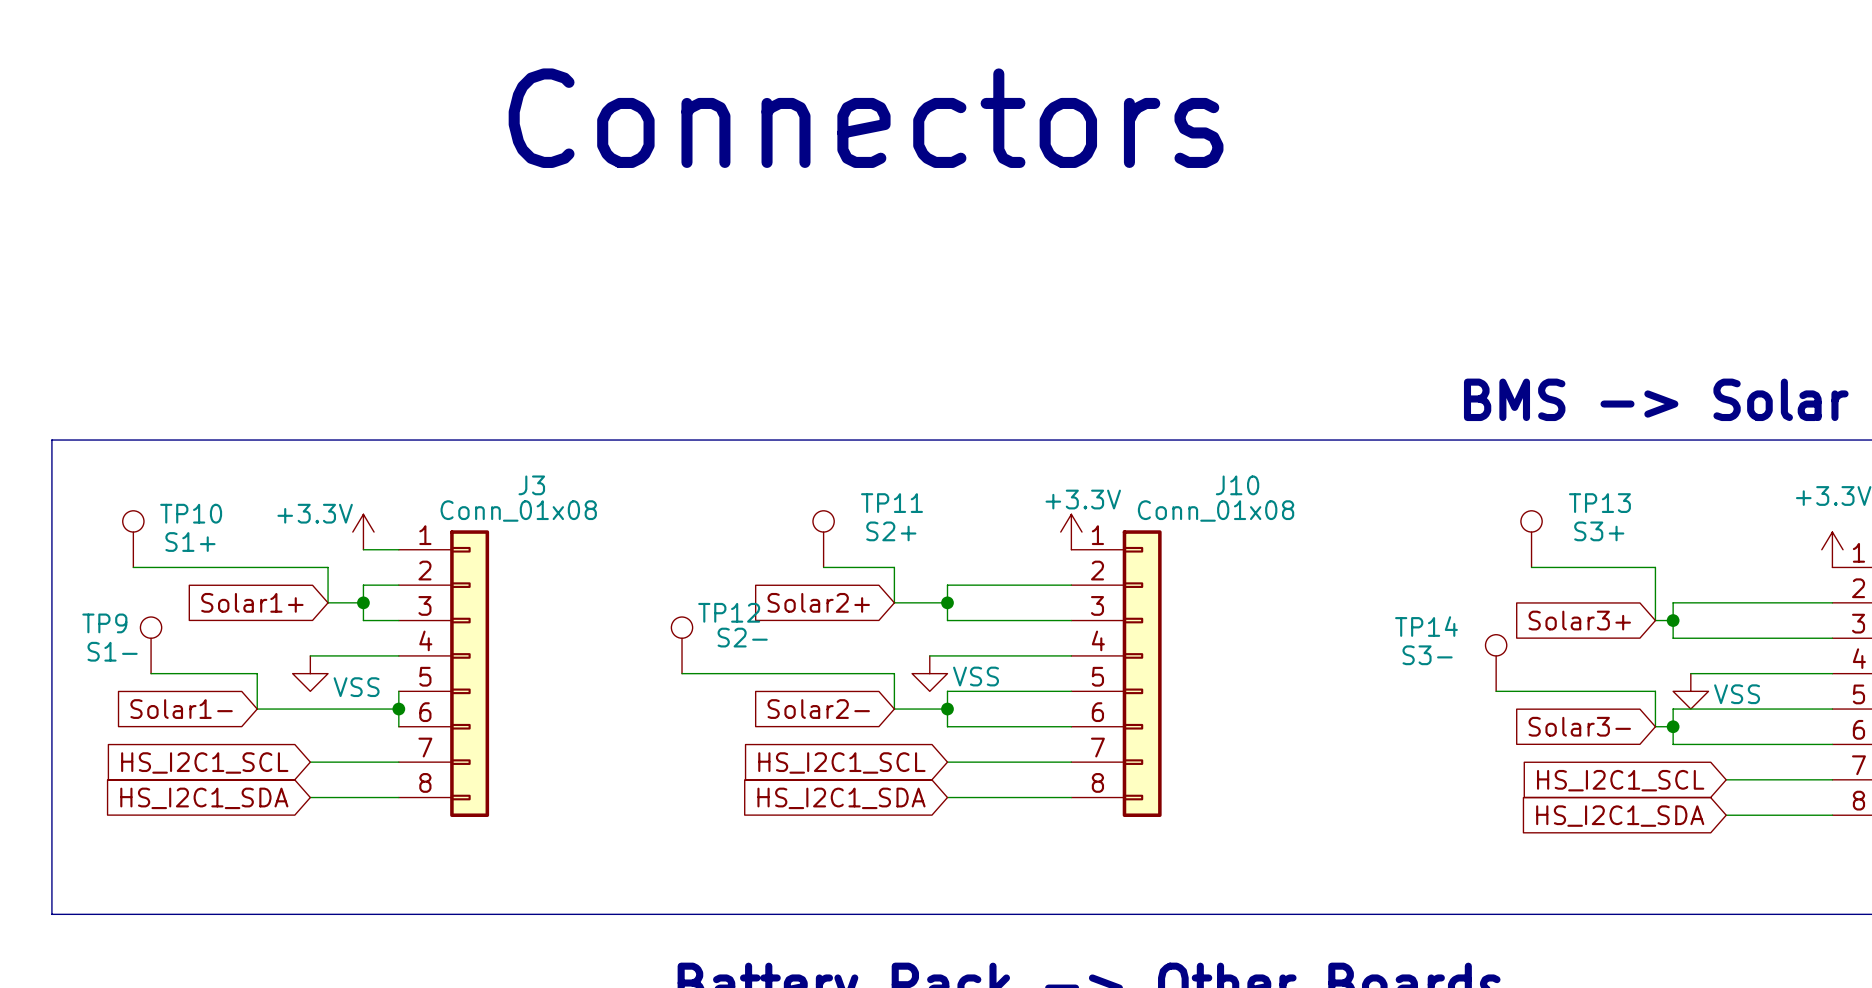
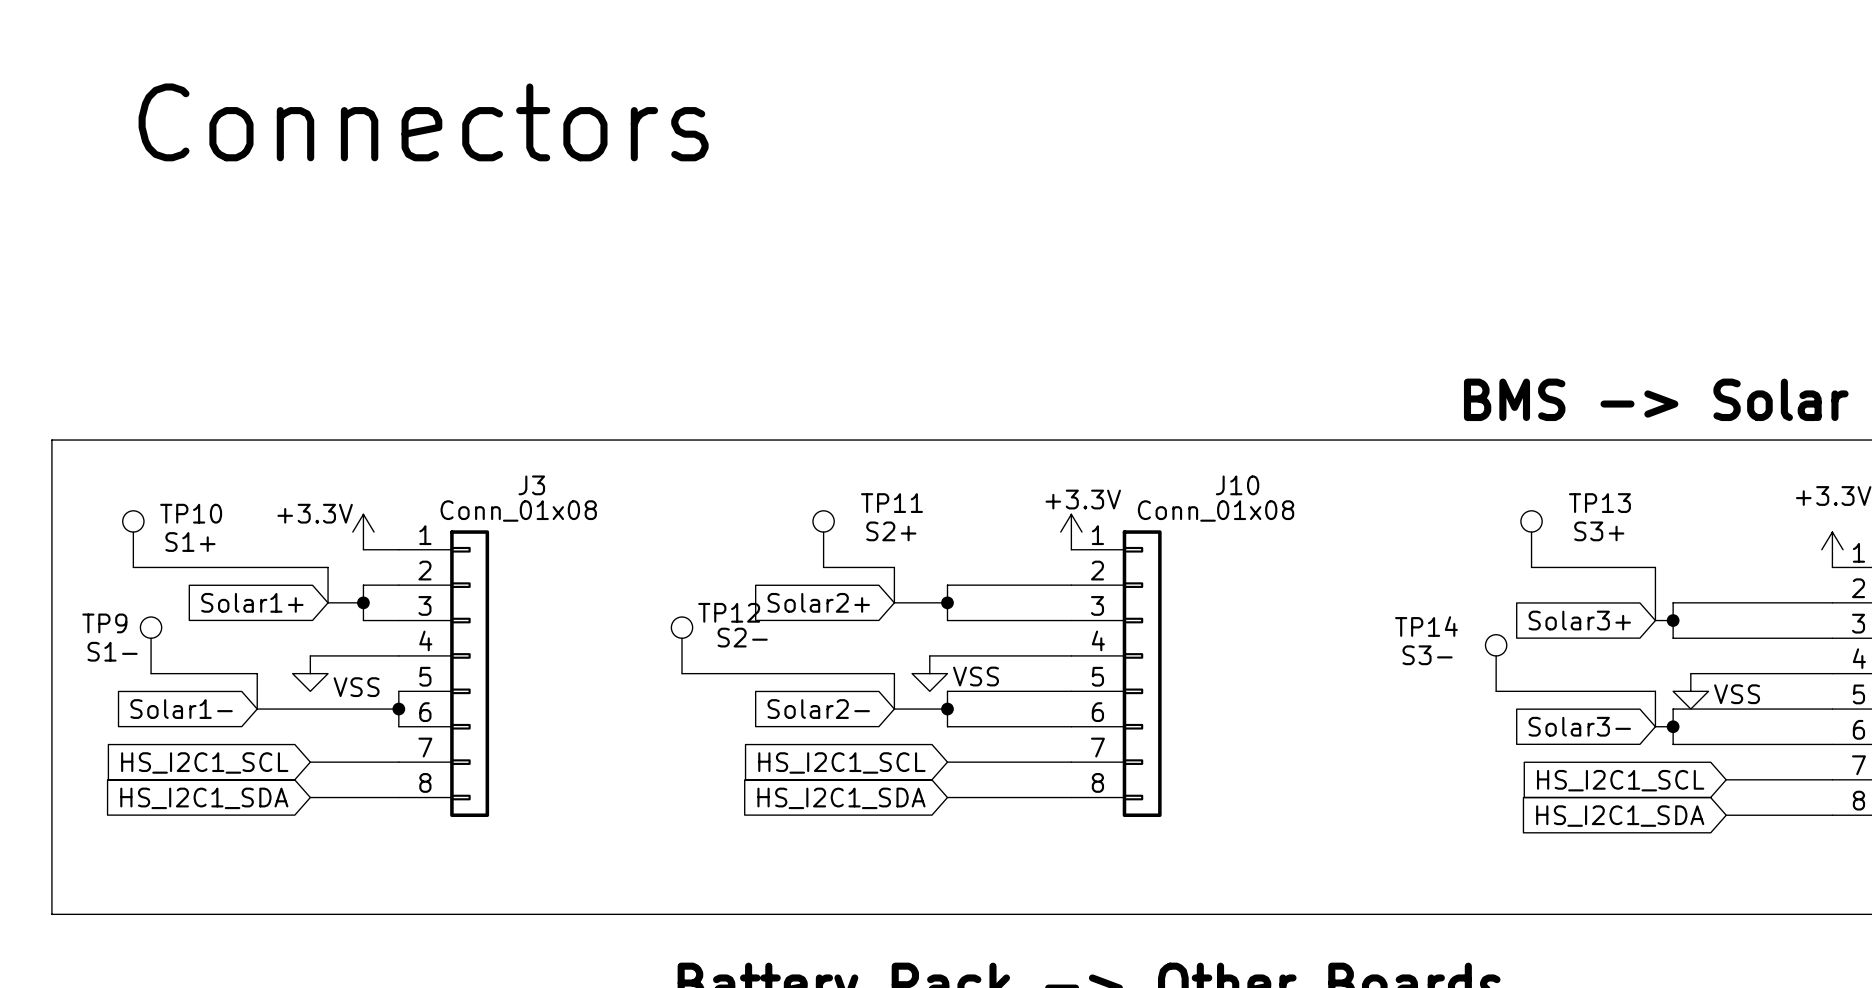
text: Connectors (866, 118) -> none
text: none -> Connectors (423, 122)

